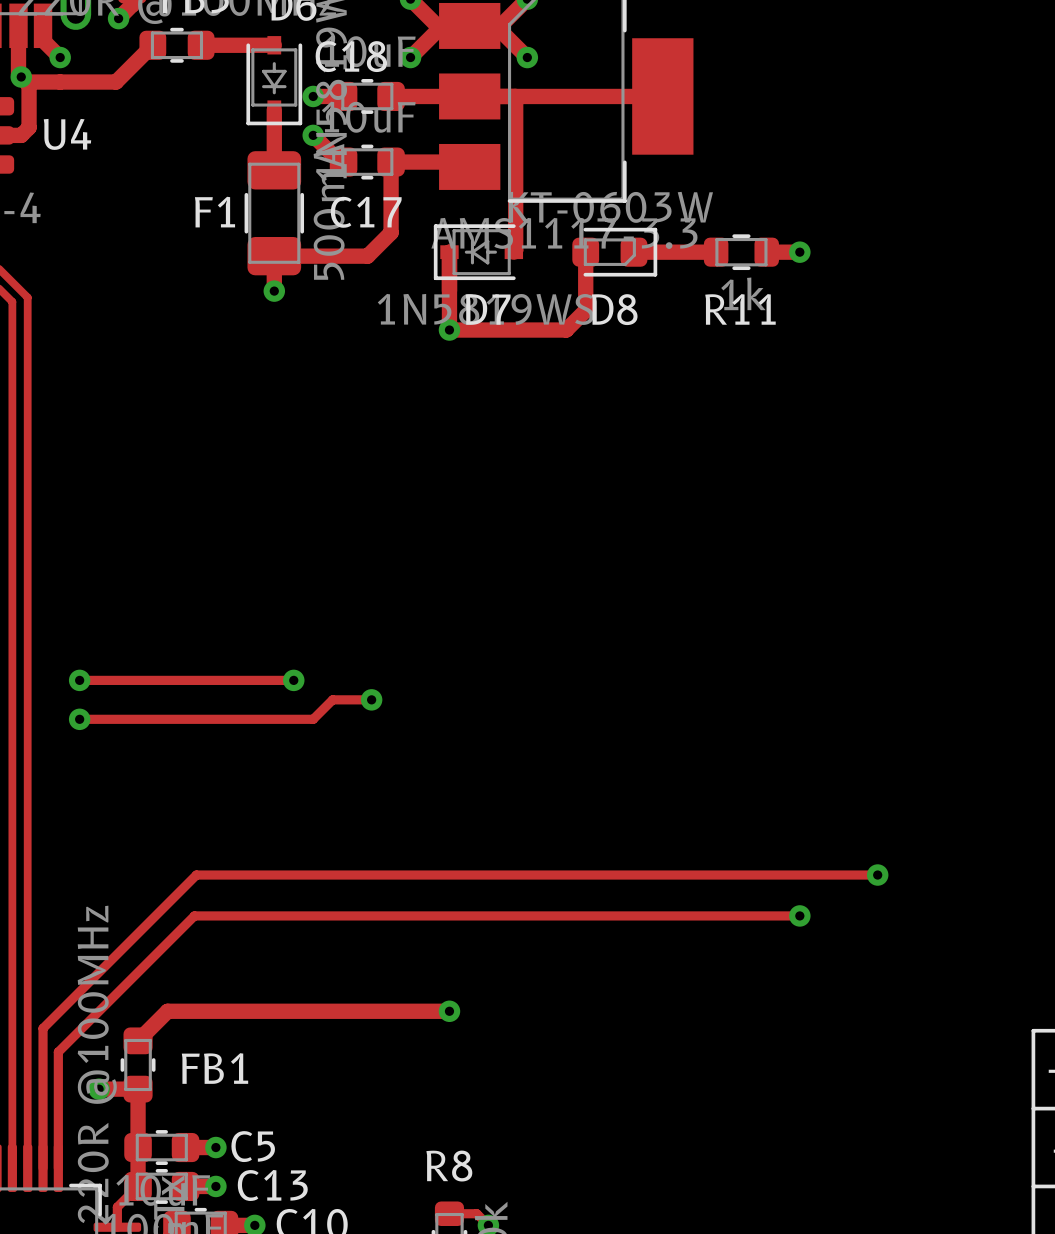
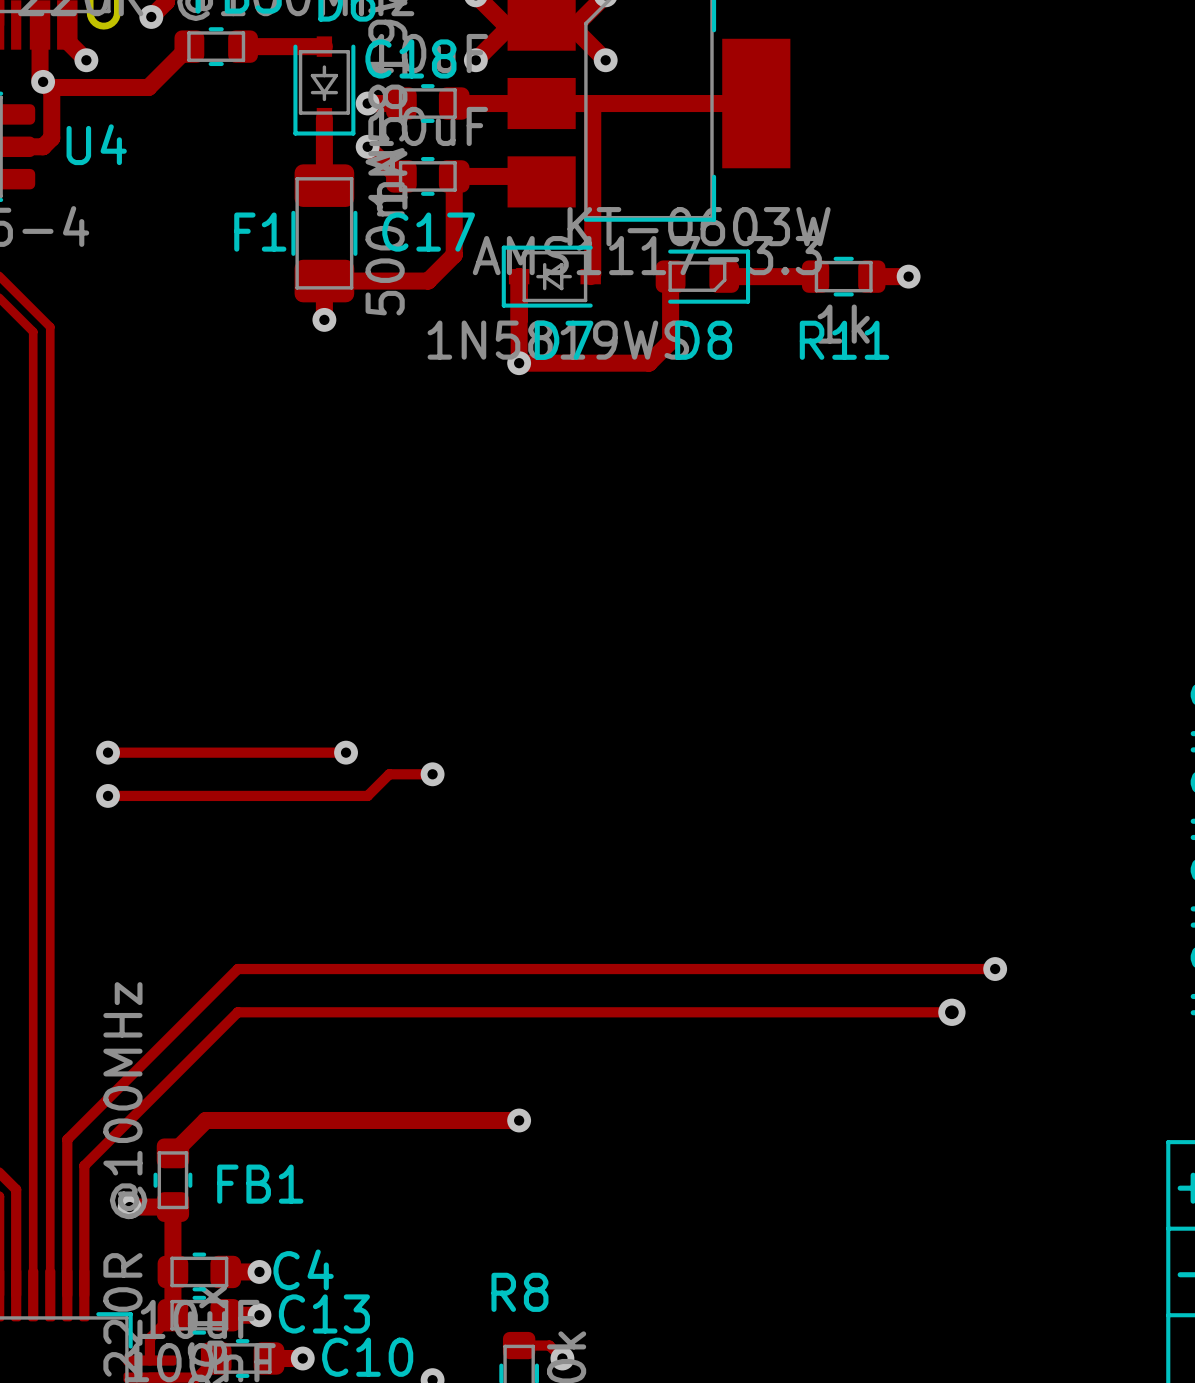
via: none -> (951, 1012)
track: (194, 915) (799, 915) -> (235, 1014) (237, 1012) (951, 1012)
via: (799, 915) -> none
C5 name: C5 (253, 1146) -> C4 (303, 1269)

